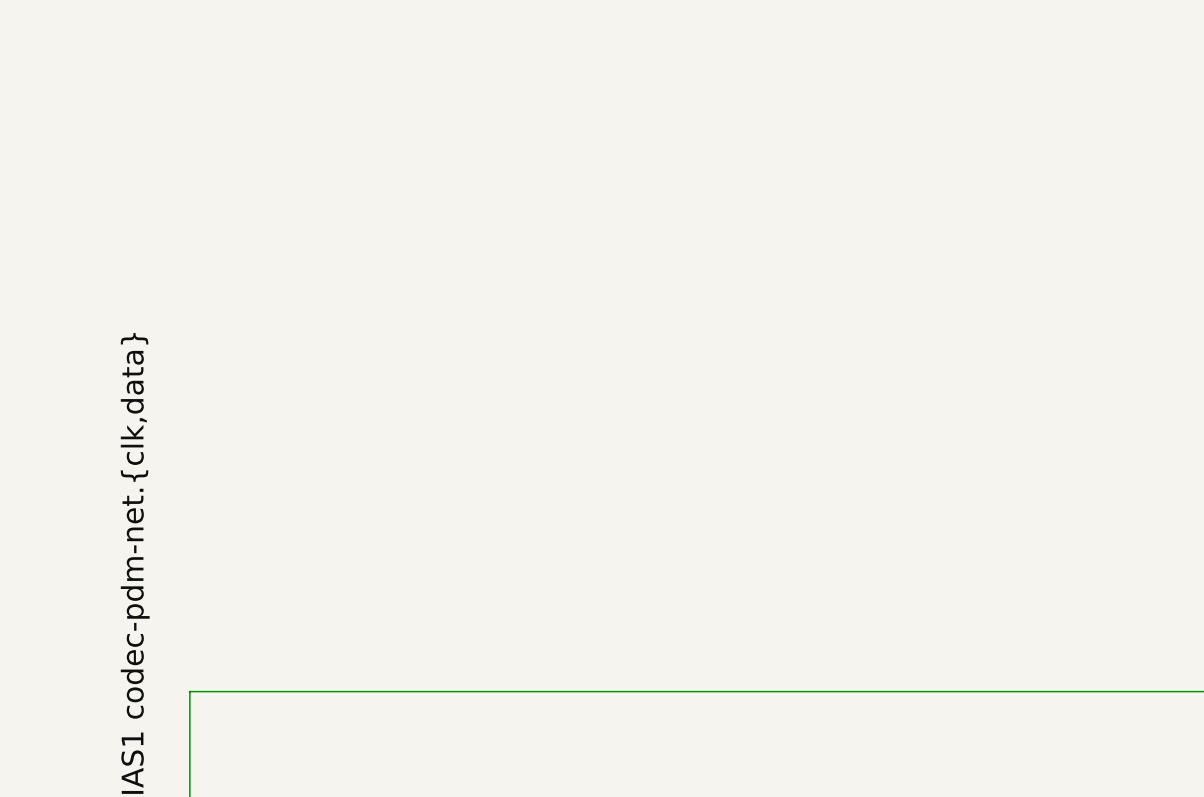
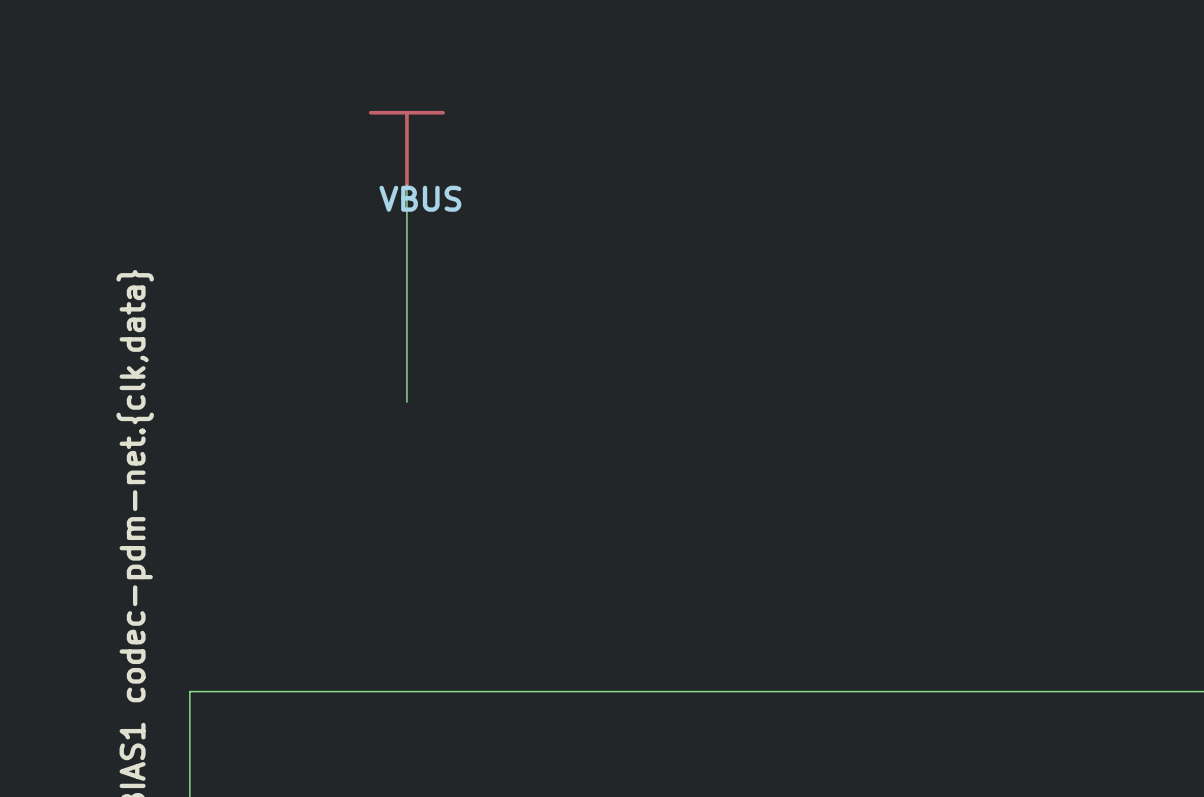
power symbol: none -> VBUS (406, 148)
wire: none -> (406, 185) (406, 402)

